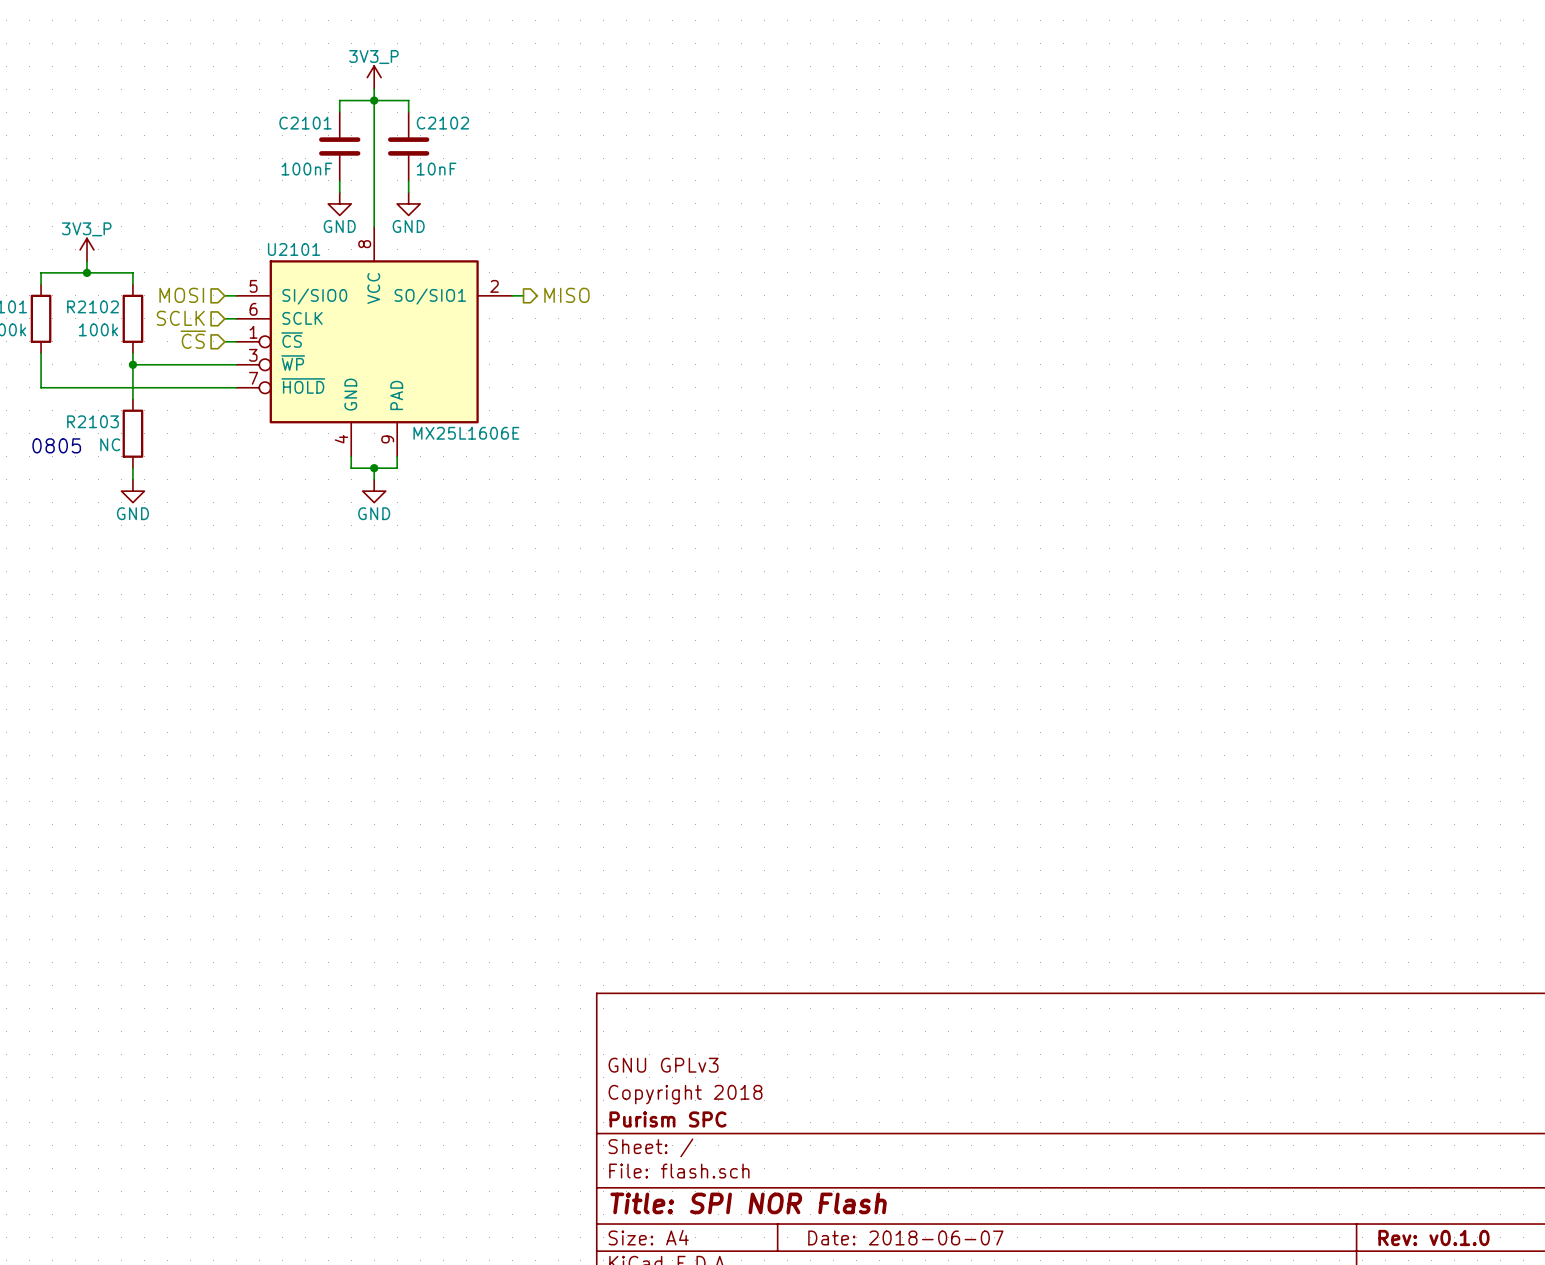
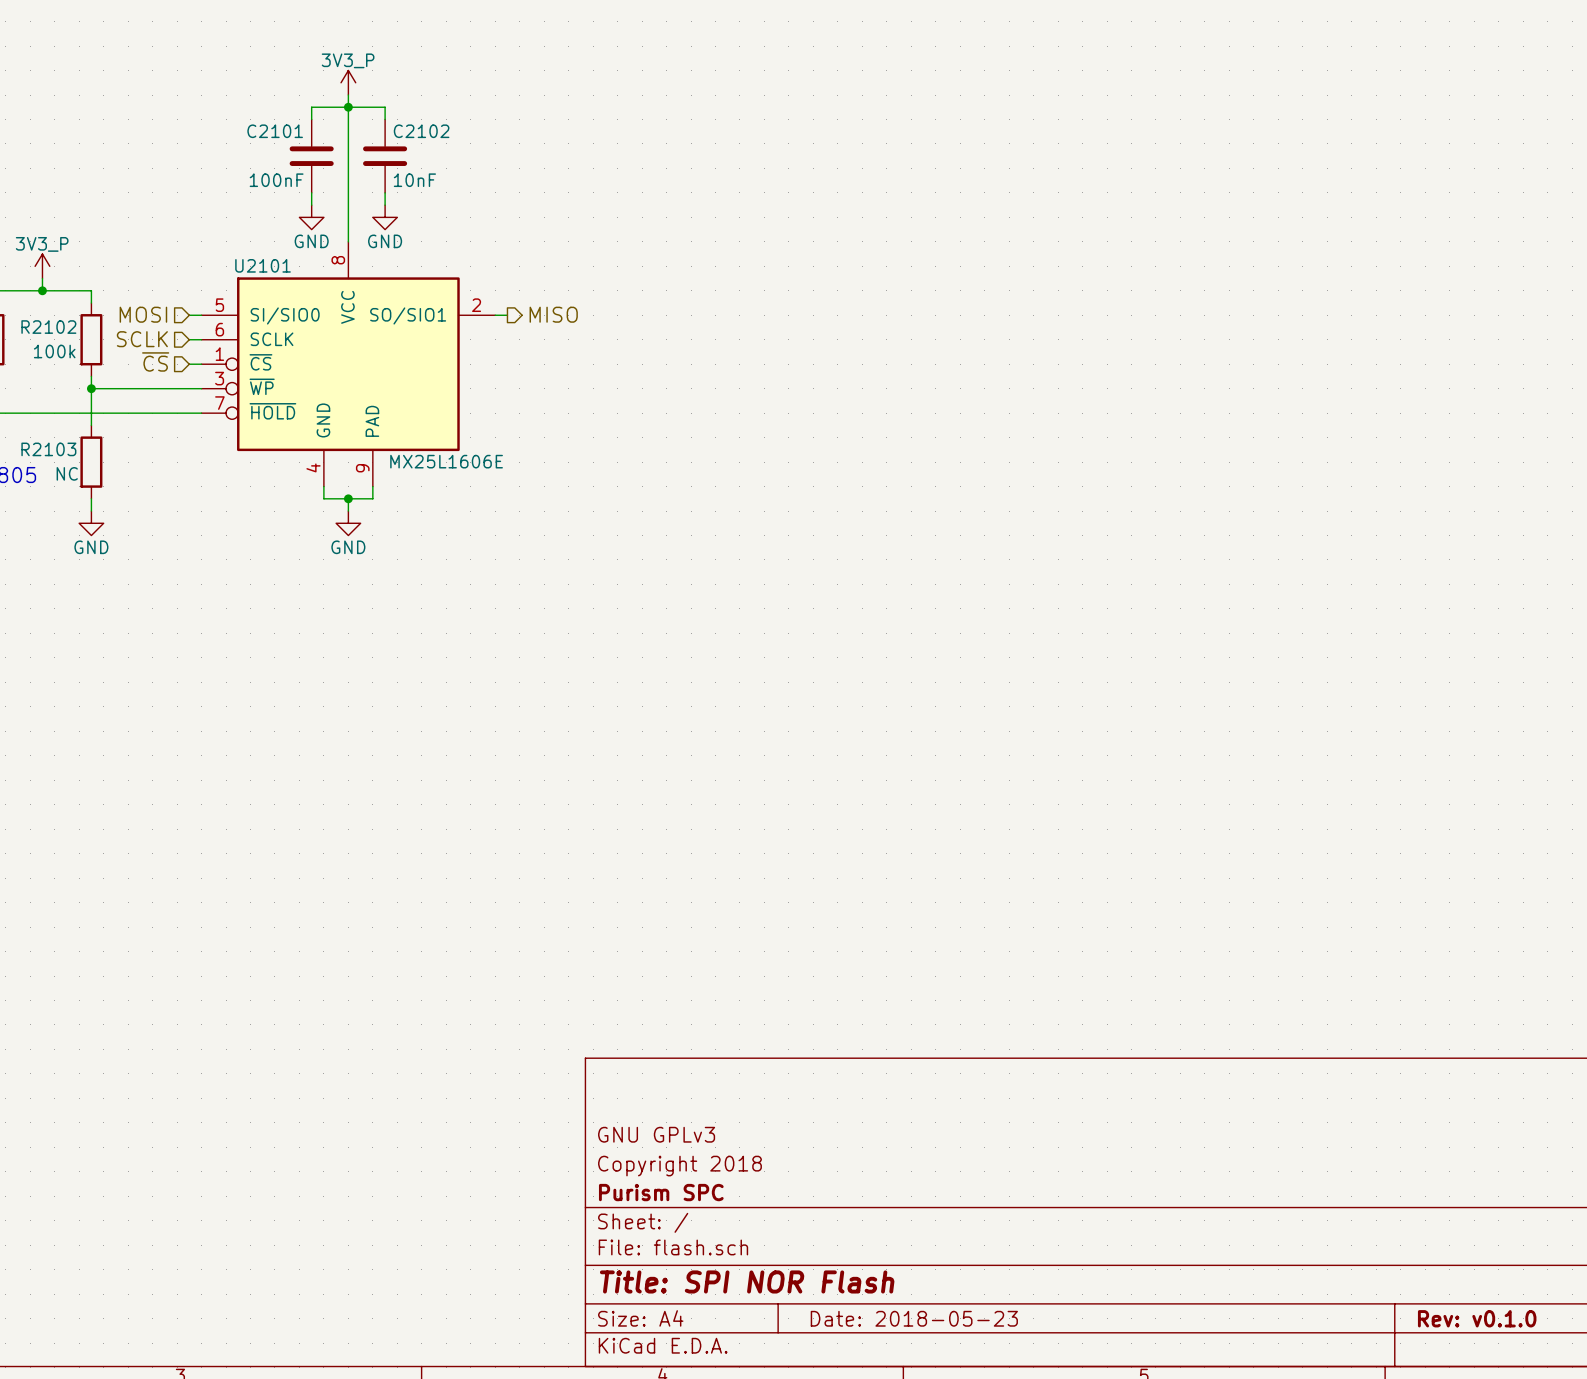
title block: Date: 2018-06-07 (905, 1237) -> Date: 2018-05-23 (914, 1318)

